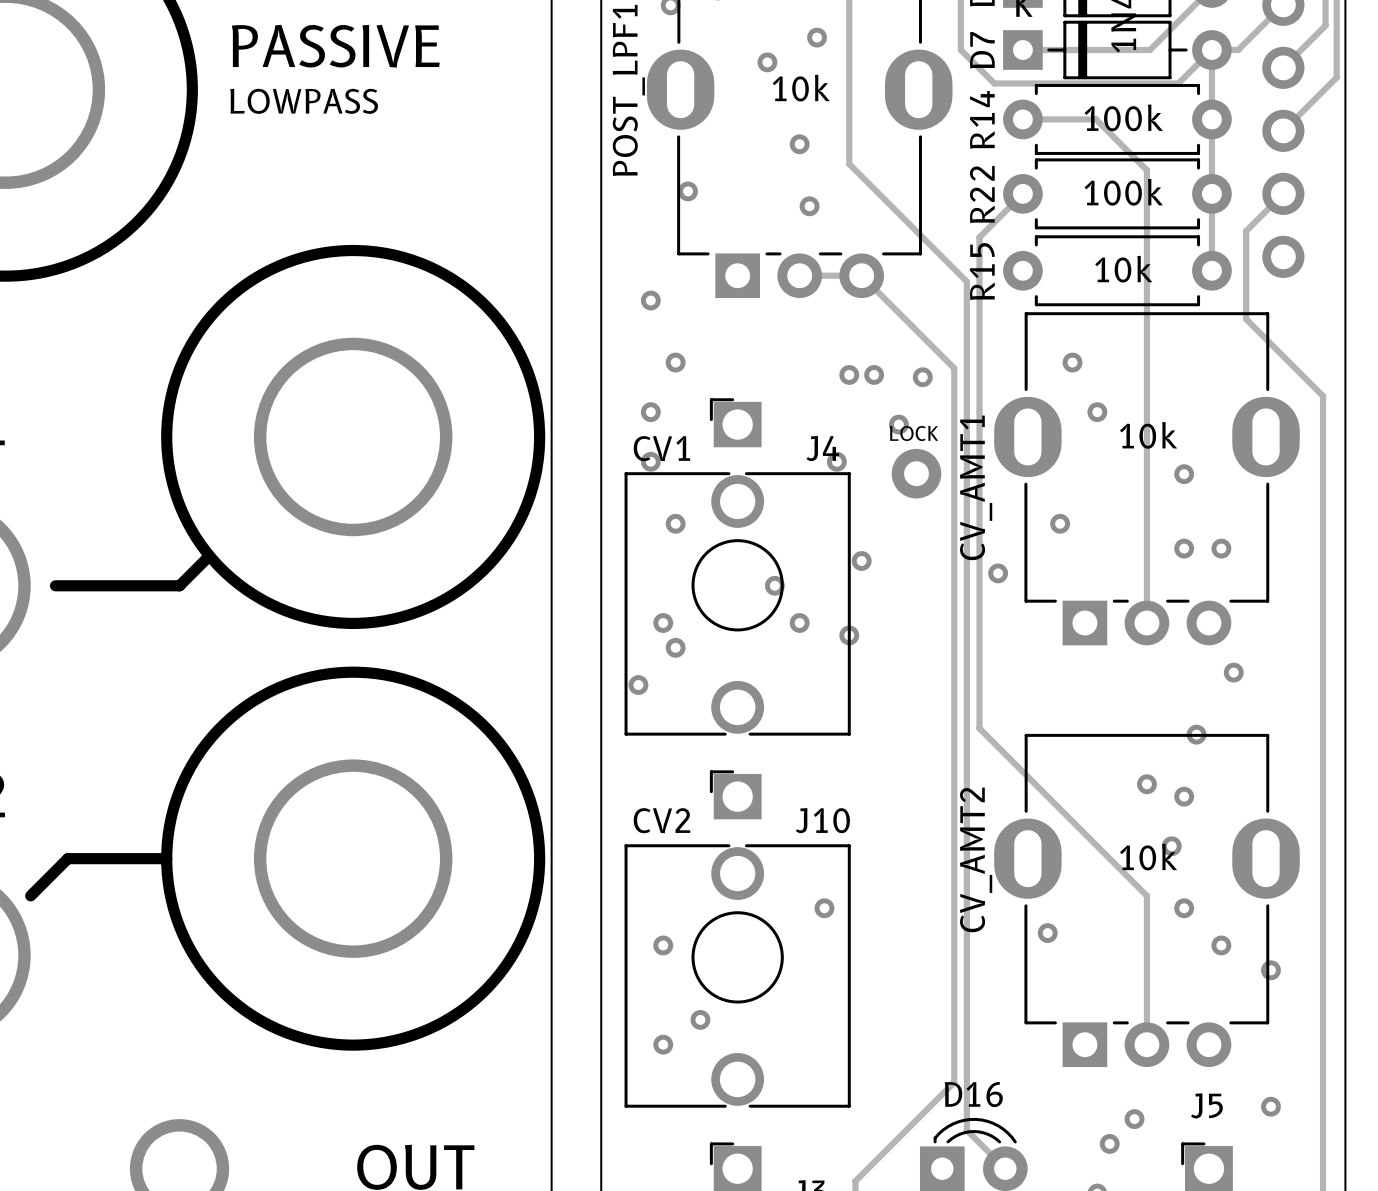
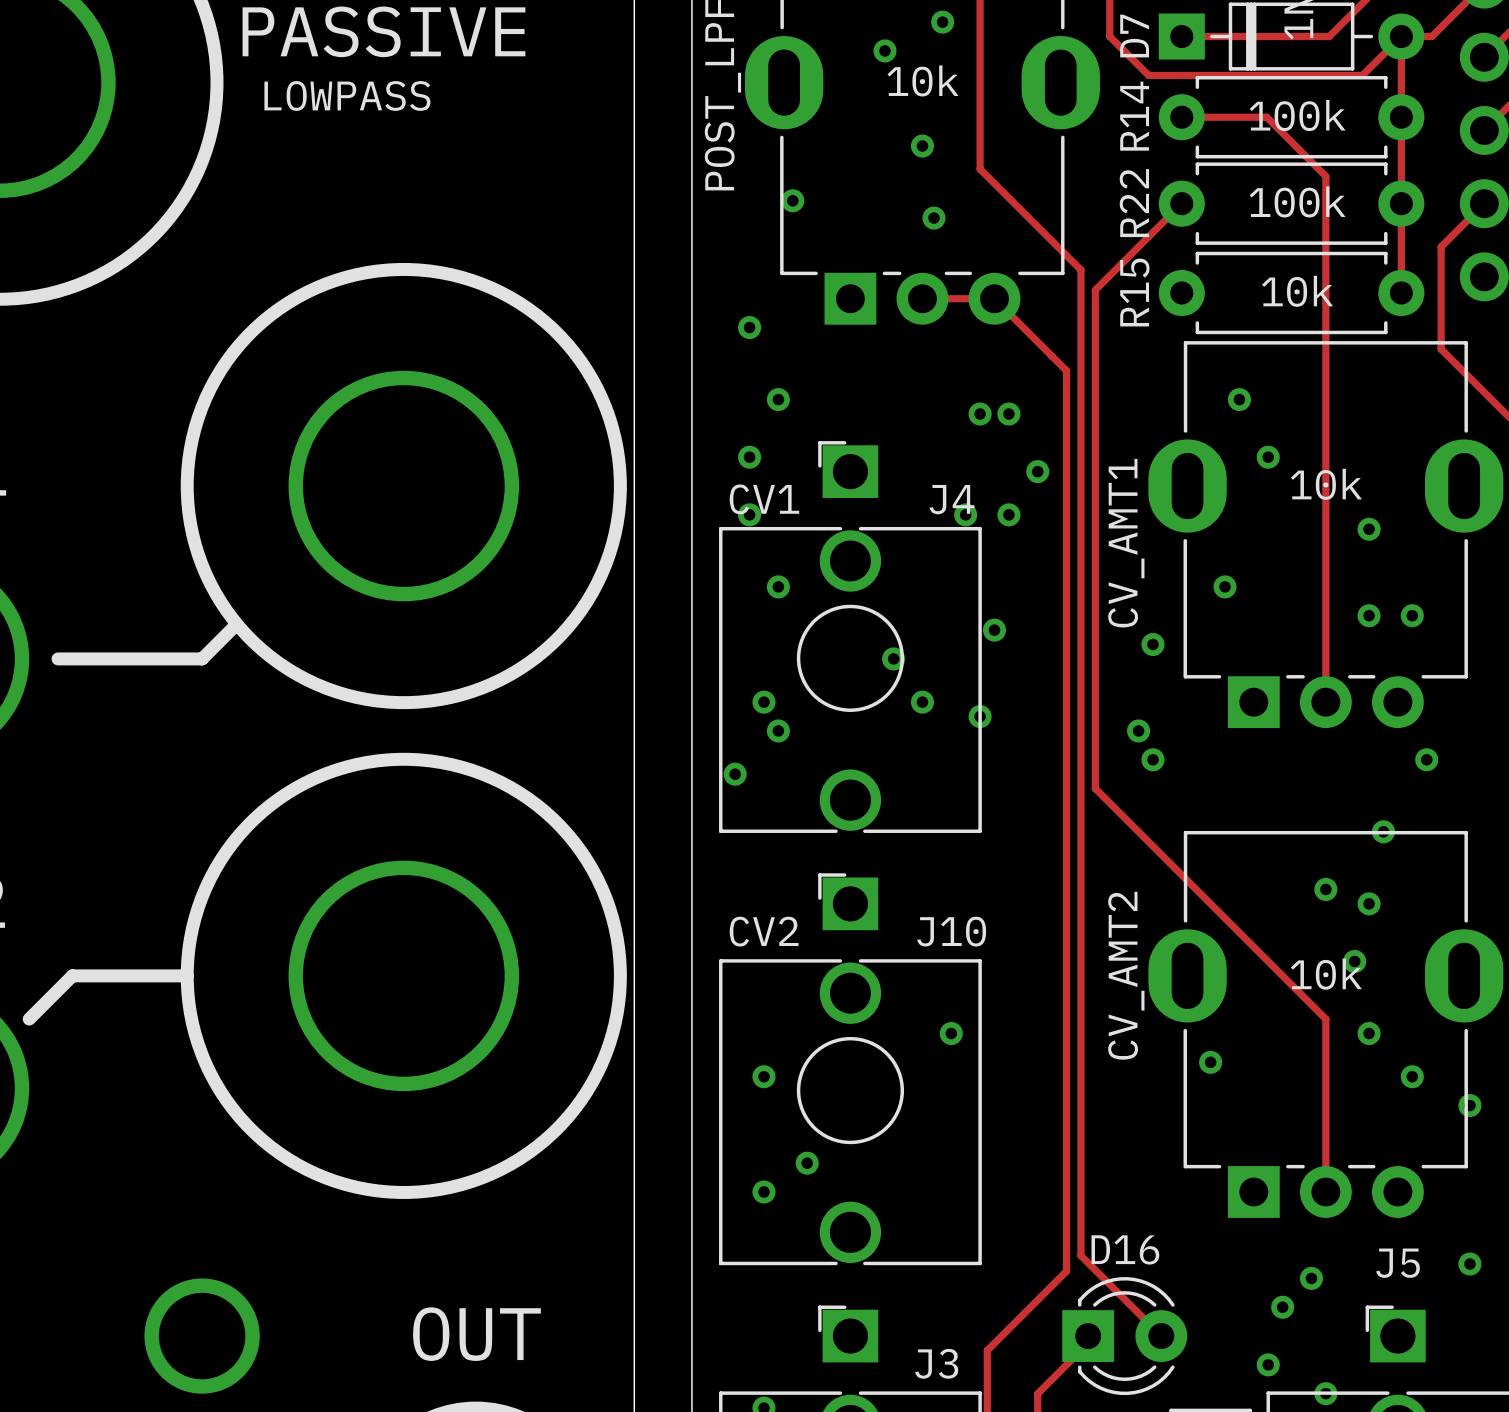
track: (979, 237) (979, 728) -> (1131, 254) (1095, 290) (1095, 788) (1131, 824)
track: (936, 250) (966, 281) (966, 1130) -> (1080, 269) (1080, 1255) (1116, 1291)
track: (923, 337) (954, 368) (954, 1082) (923, 1112) -> (1066, 370) (1066, 1271)
via position: (922, 377) -> (1008, 514)
text: LOCK (914, 433) -> none
part: (916, 473) -> none
via: none -> (1138, 730)
via: none -> (1152, 759)

